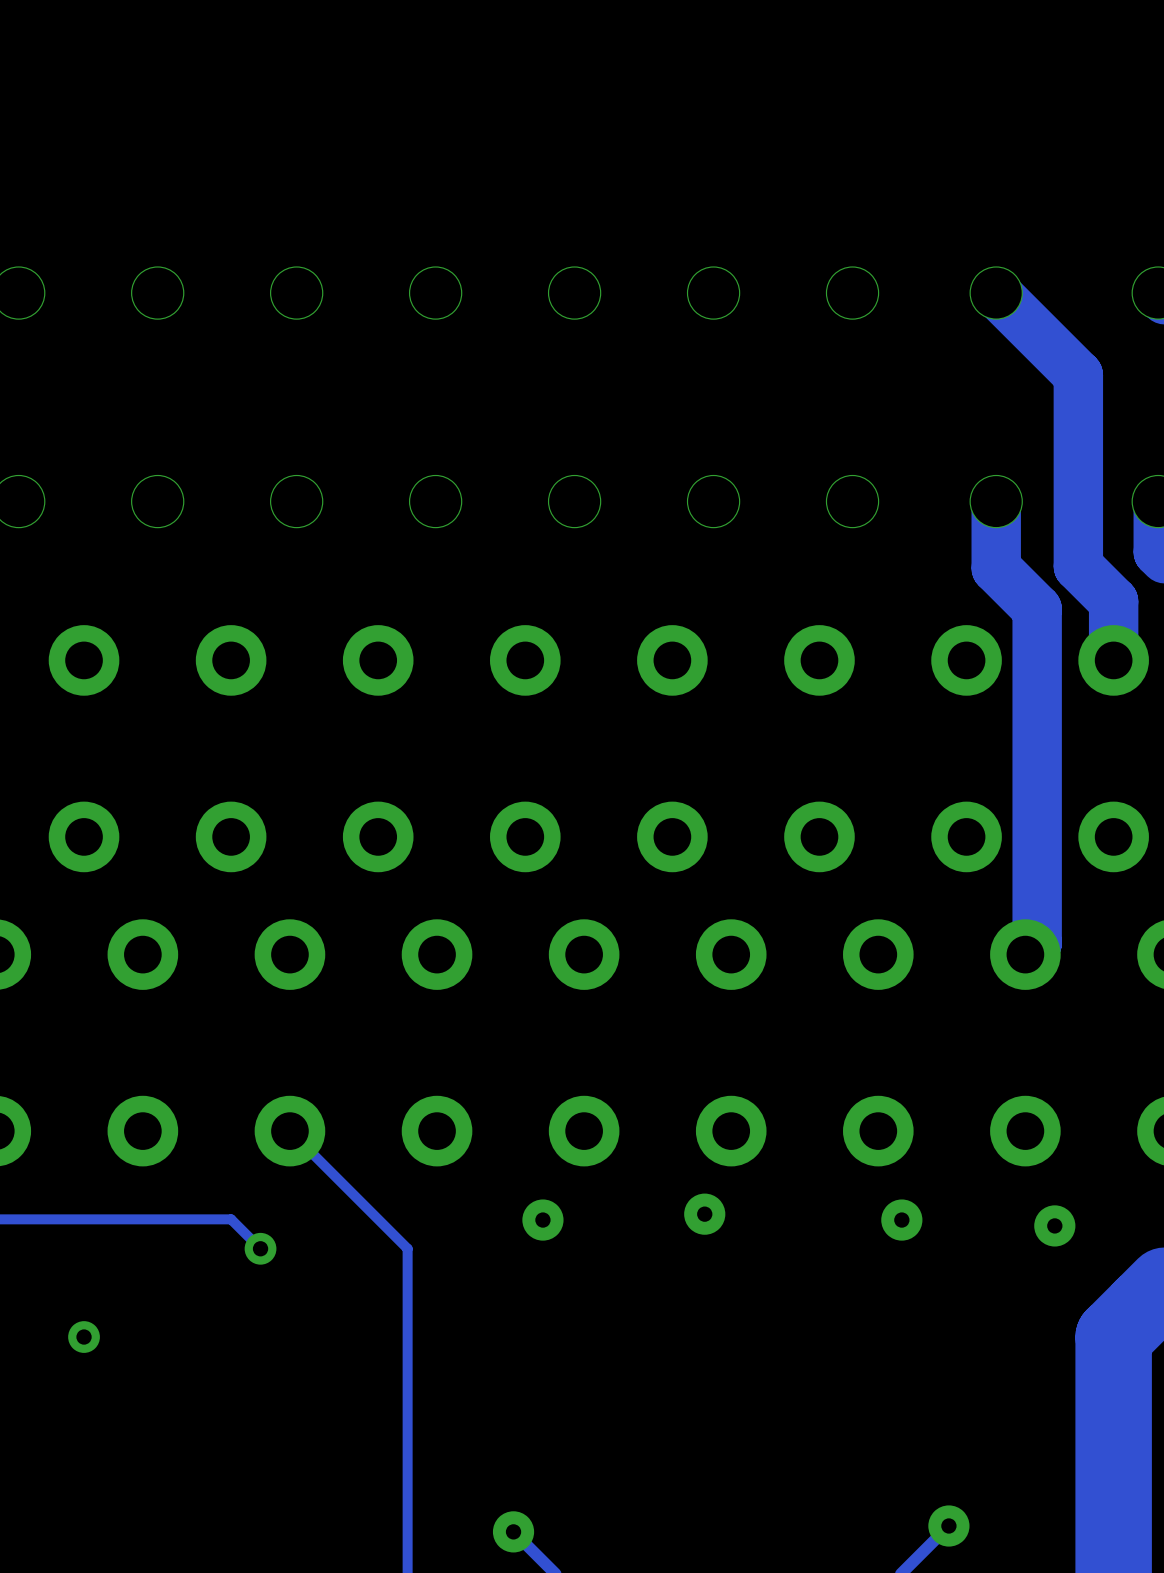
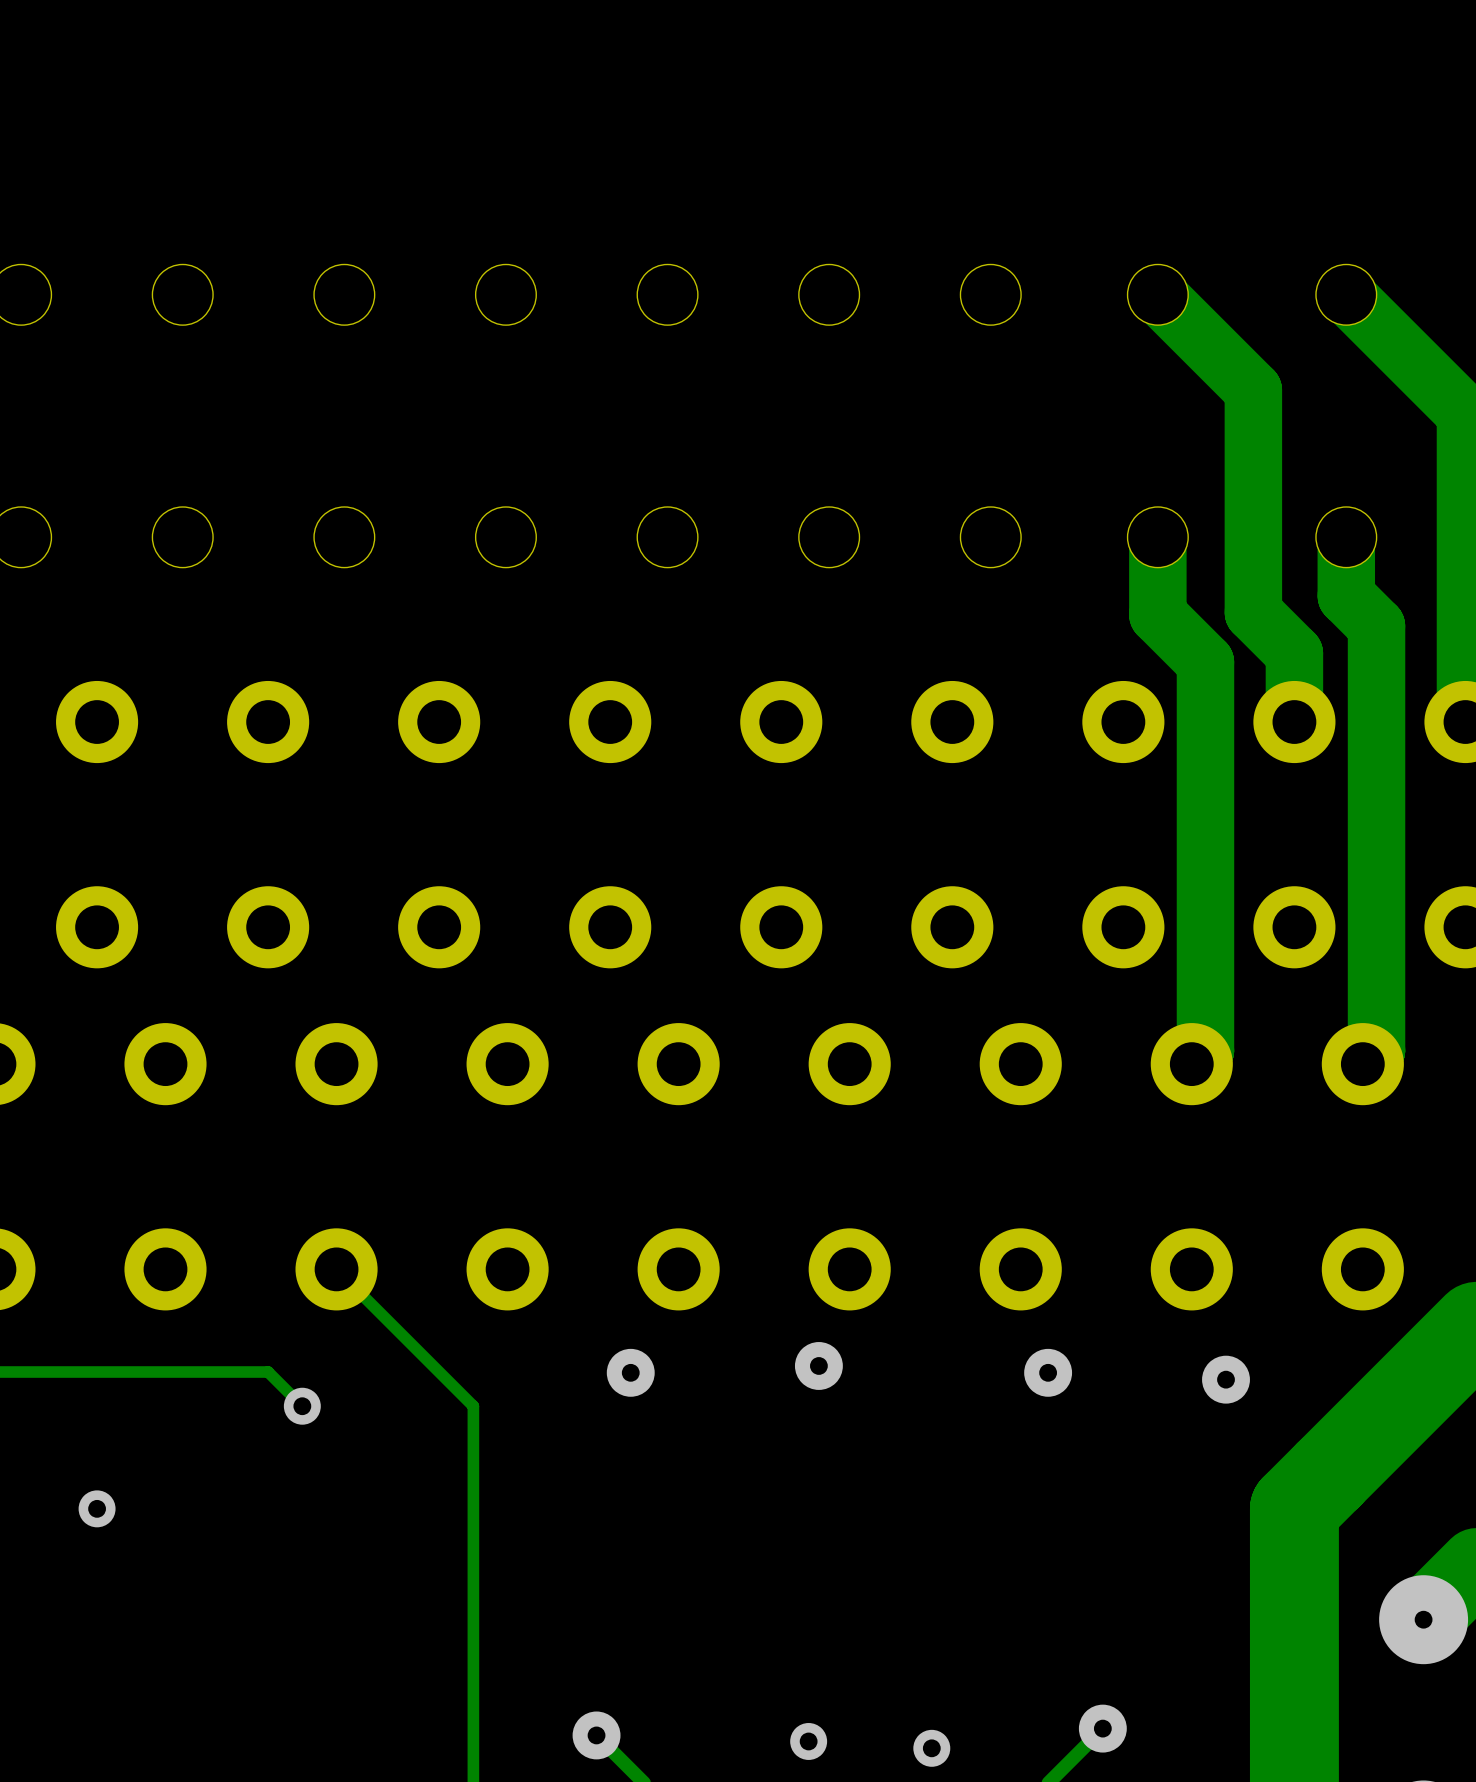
via: none -> (808, 1741)
via: none -> (931, 1748)

